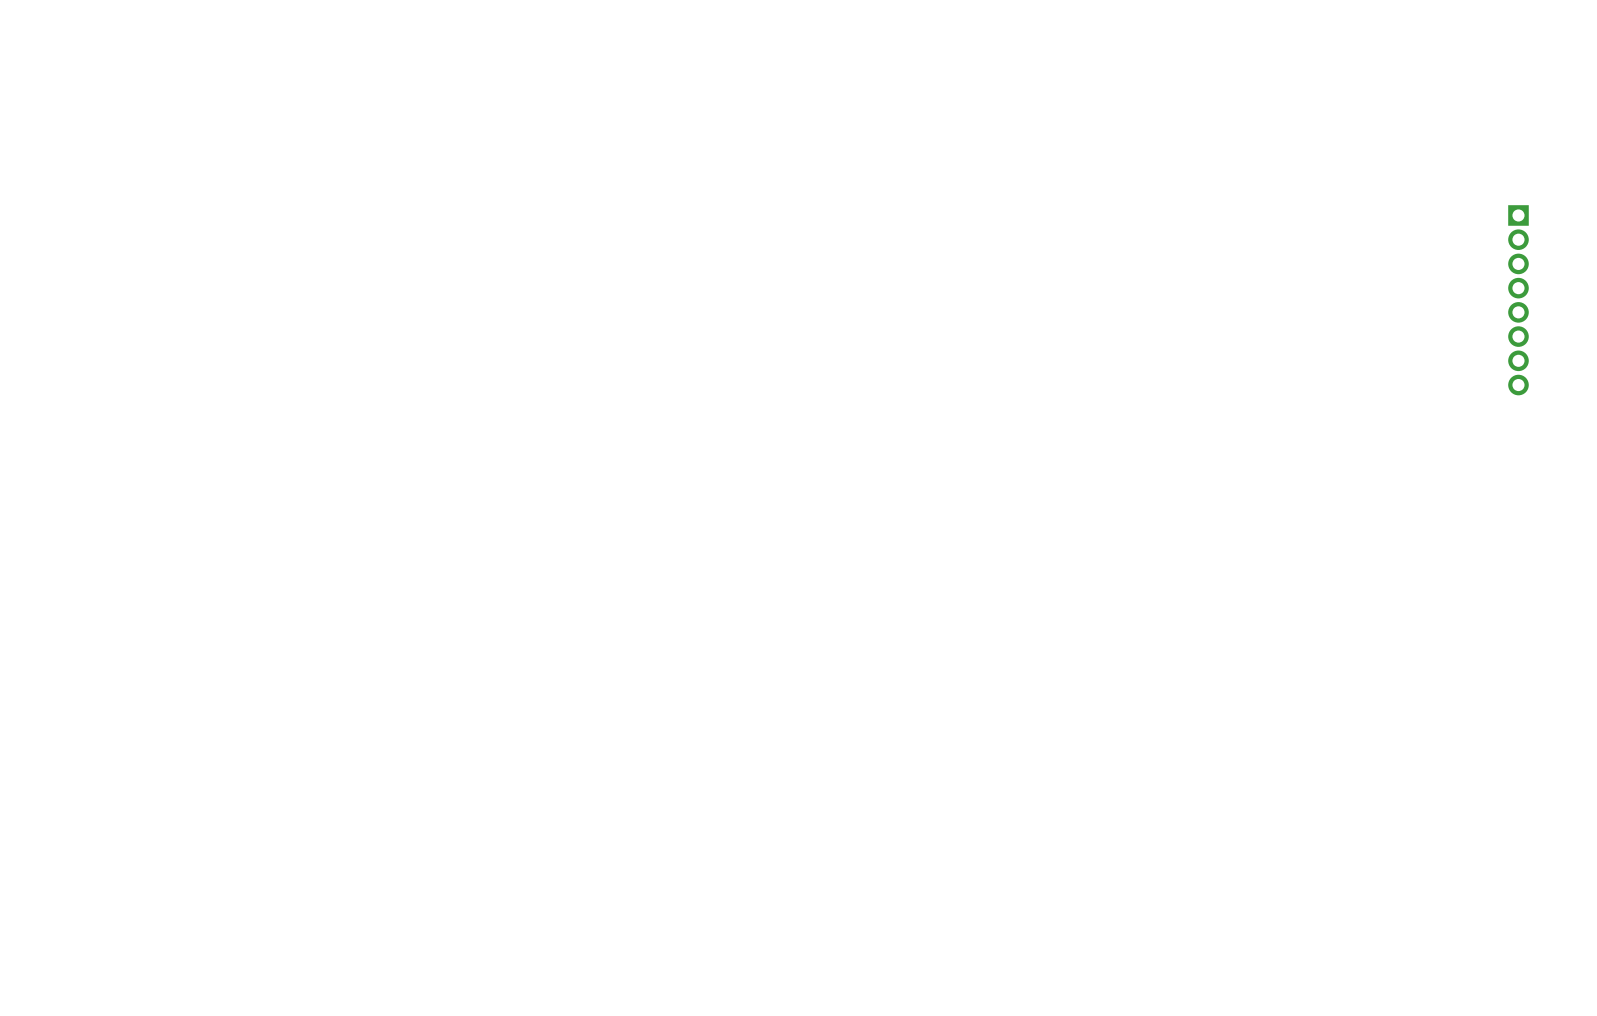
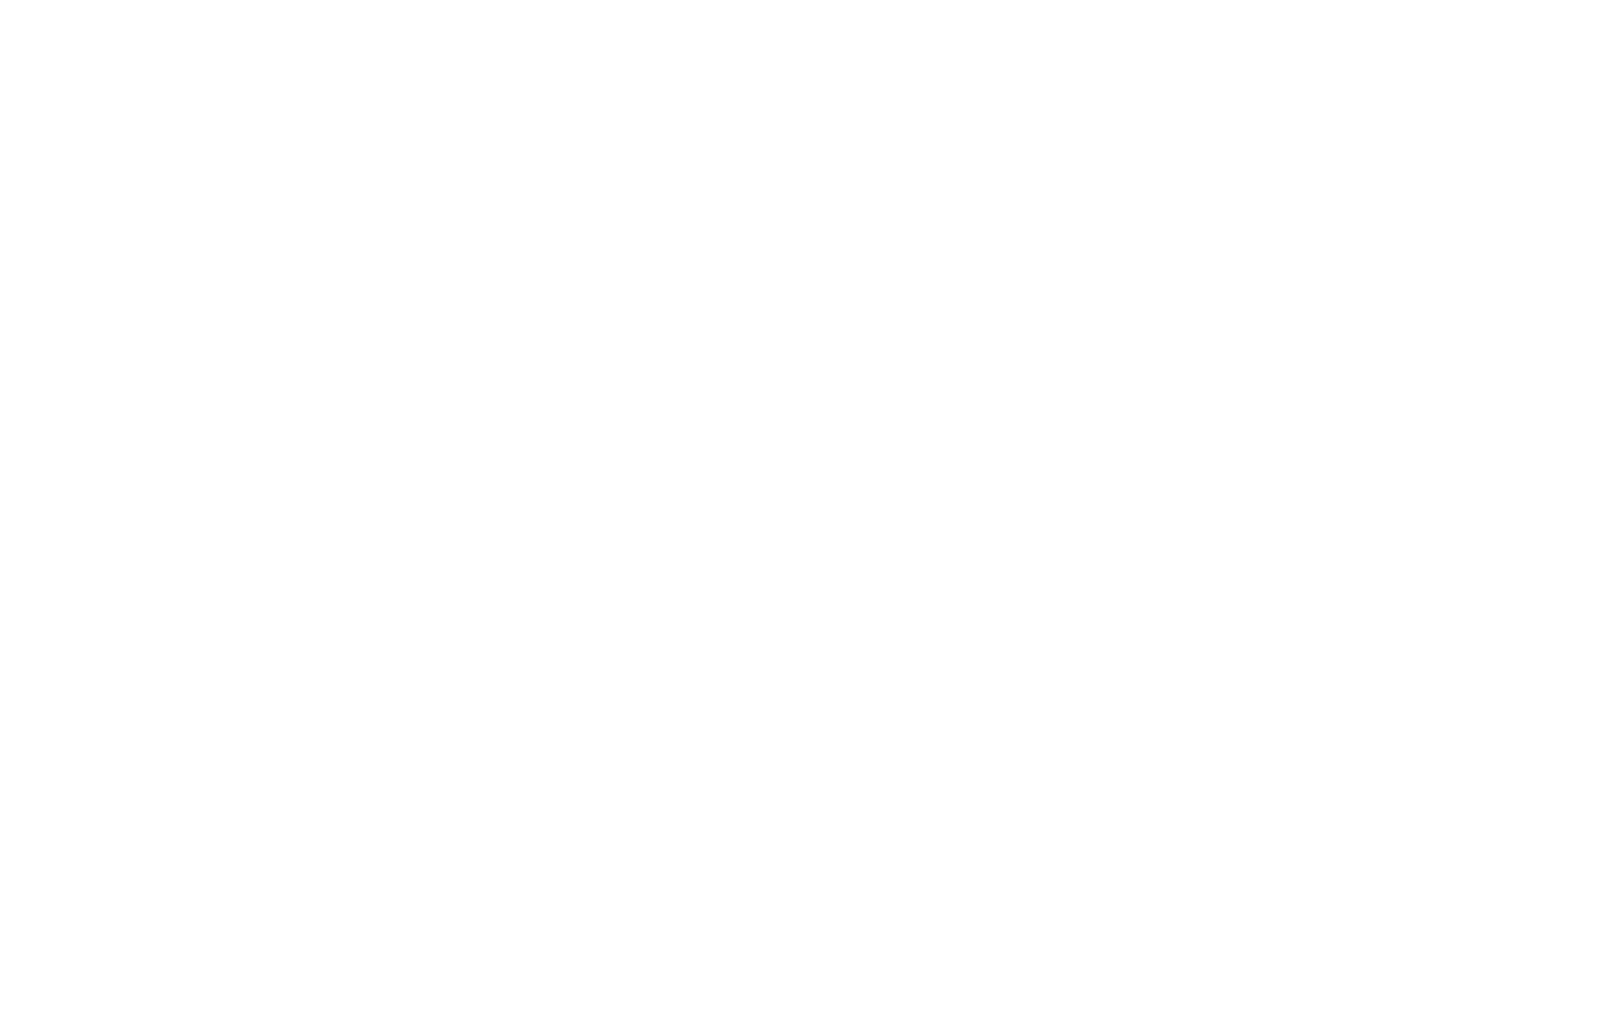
part: (1518, 300) -> none

